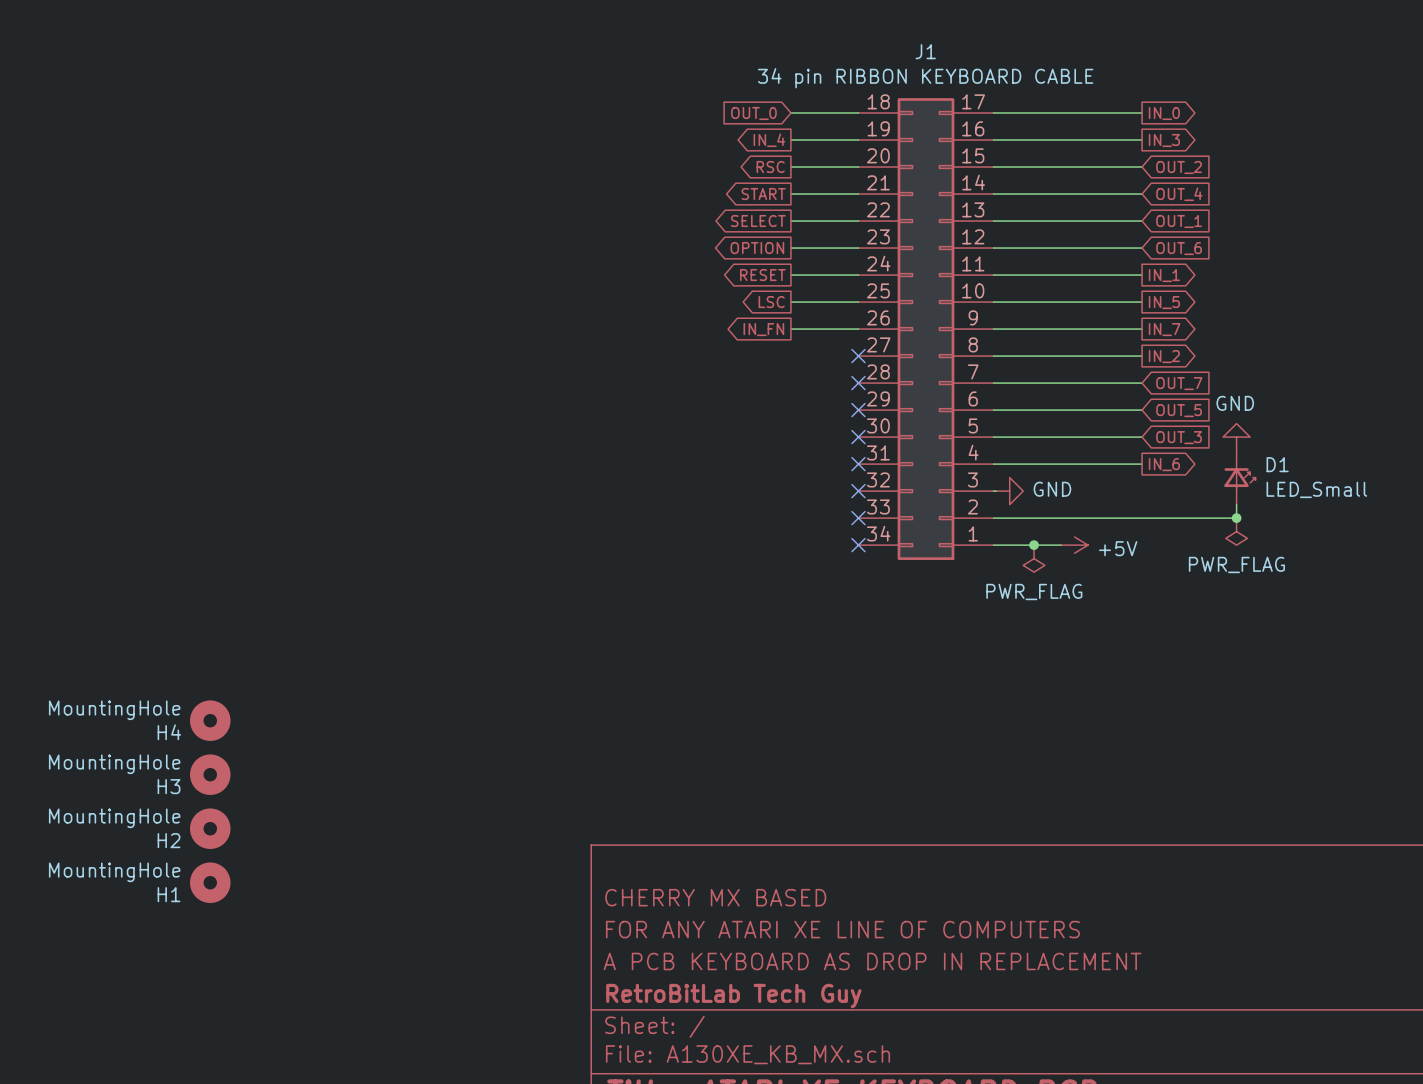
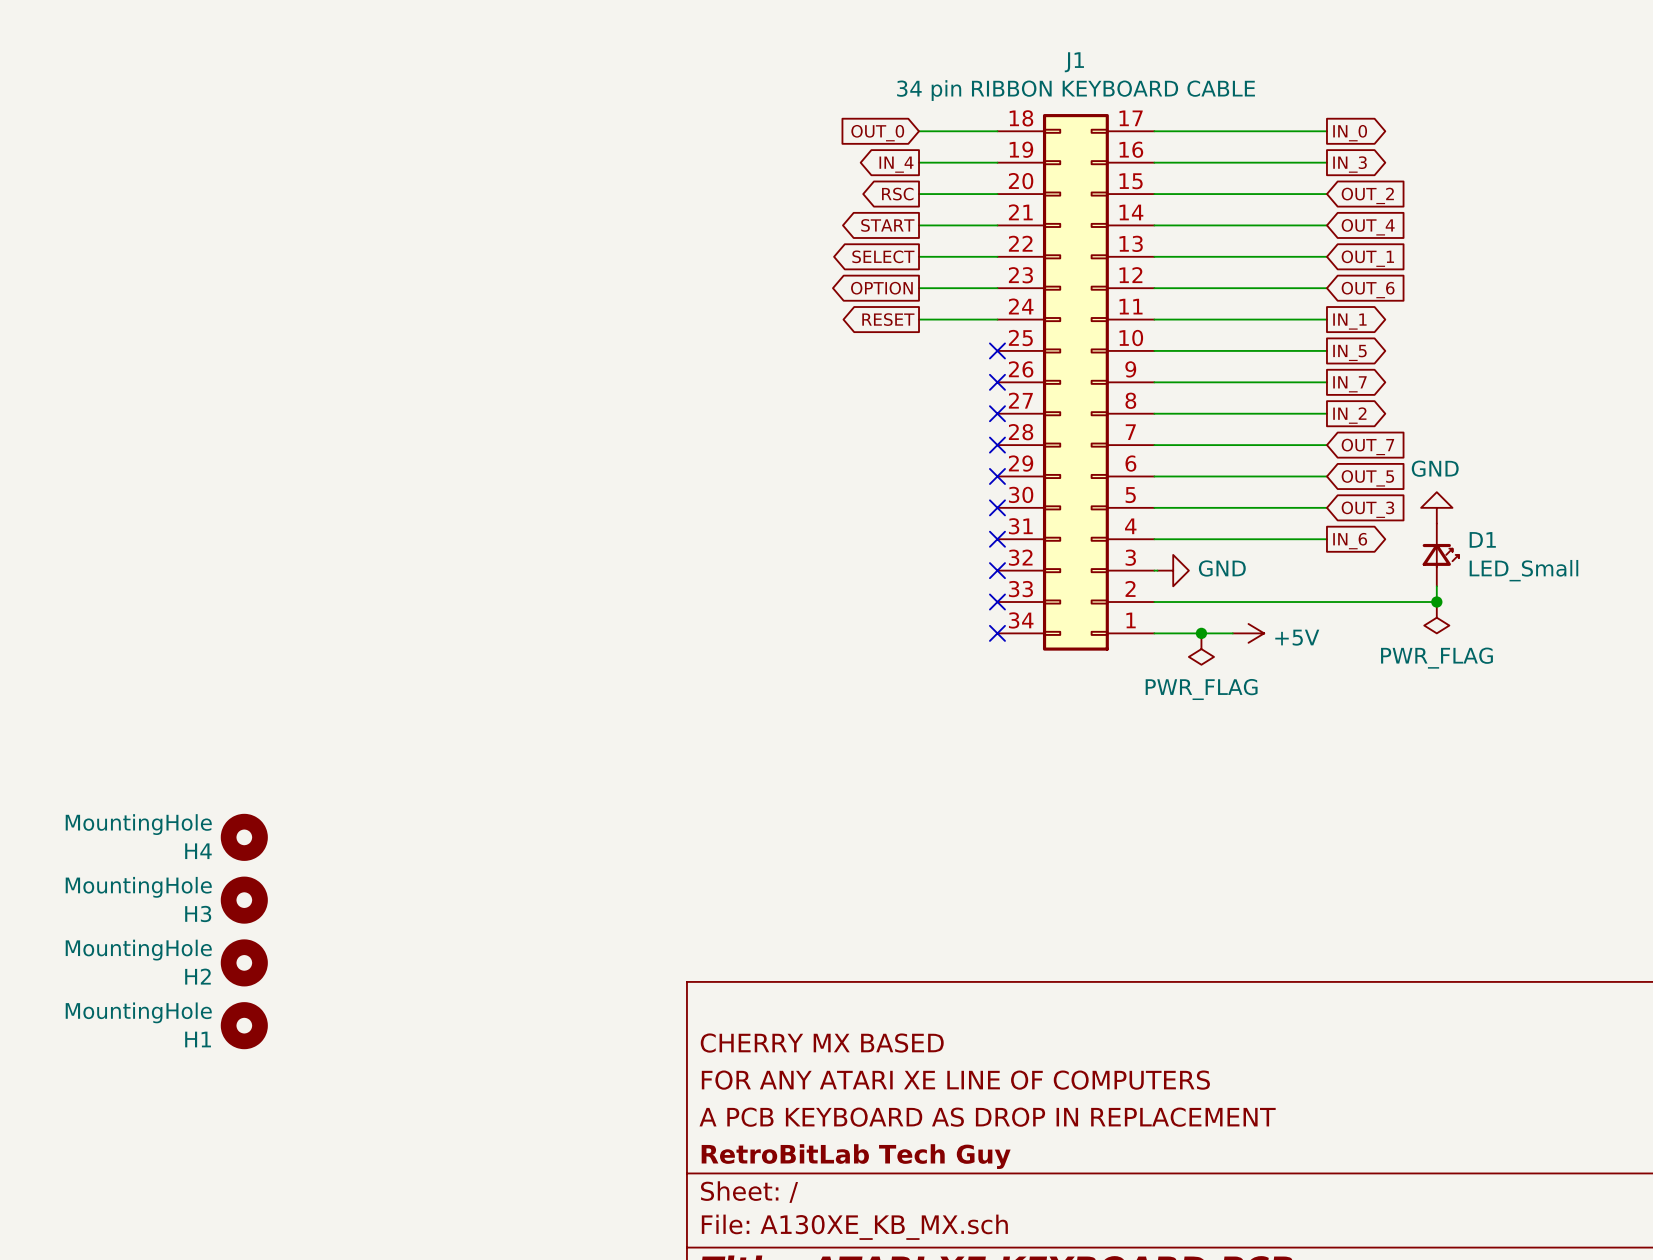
global label: LSC (771, 302) -> none
wire: (790, 302) (858, 302) -> none
no-connect mark: none -> (997, 350)
global label: IN_FN (763, 329) -> none
wire: (790, 329) (858, 329) -> none
no-connect mark: none -> (997, 382)

